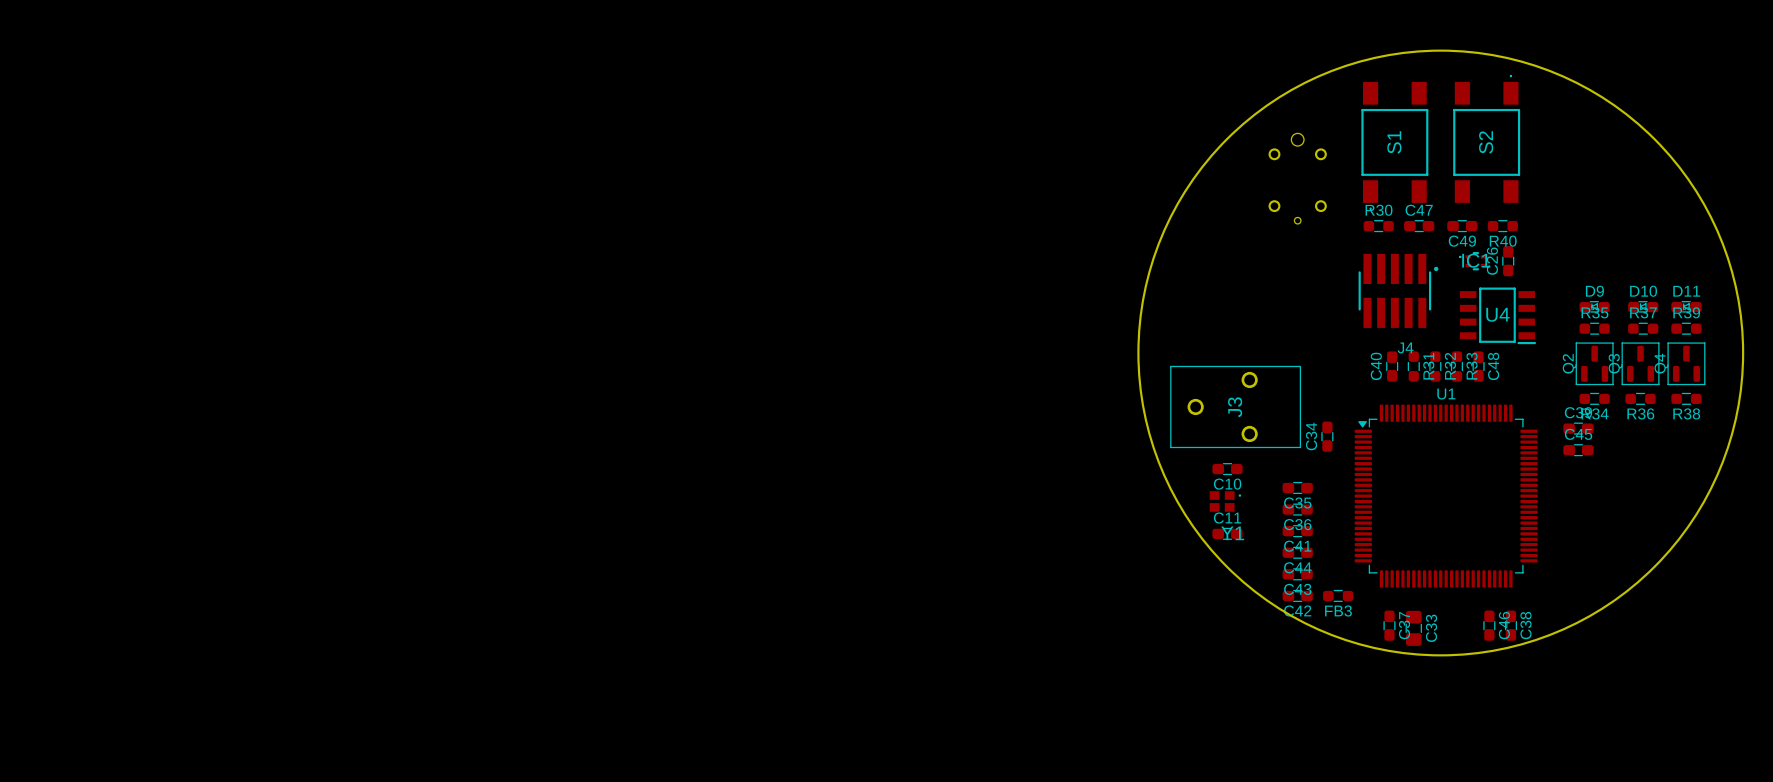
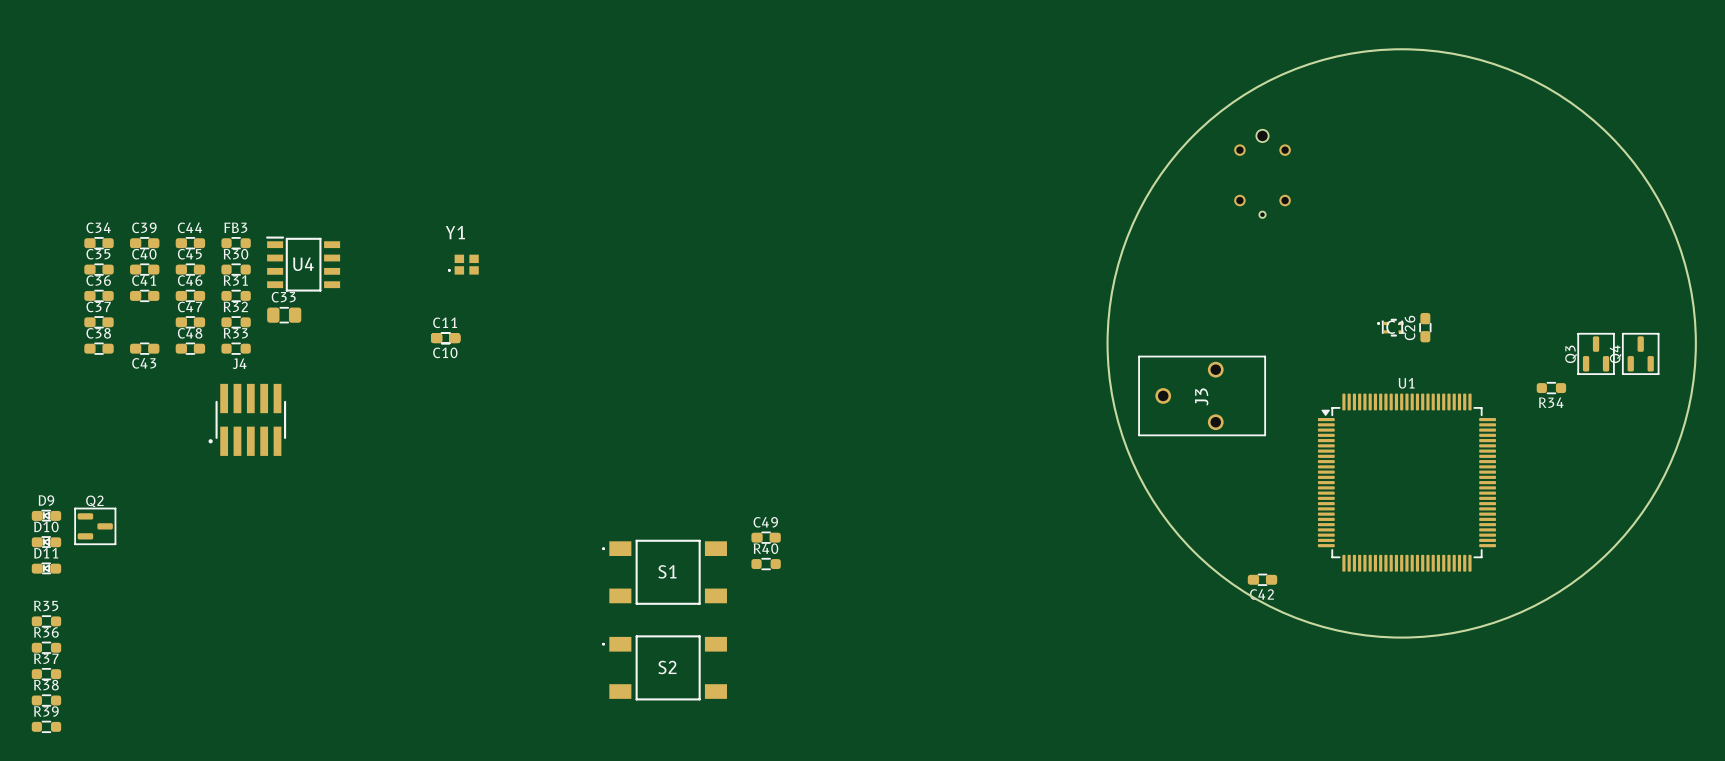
S2 rotation: 0° (1486, 138) -> 90° counterclockwise (664, 667)
S2 position: (1486, 138) -> (664, 667)
S1 rotation: 0° (1394, 145) -> 90° clockwise (664, 572)
S1 position: (1394, 145) -> (664, 572)
R30 position: (1378, 226) -> (236, 269)
C47 position: (1419, 226) -> (190, 322)
C49 position: (1462, 226) -> (766, 537)
R40 position: (1502, 226) -> (766, 564)
C49 name position: C49 (1462, 241) -> C49 (765, 522)
R40 name position: R40 (1503, 241) -> R40 (765, 548)
IC1 position: (1472, 261) -> (1390, 327)
C26 position: (1508, 261) -> (1425, 327)
J4 rotation: 0° (1398, 290) -> 180° (247, 419)
J4 position: (1398, 290) -> (247, 419)
D9 position: (1594, 306) -> (46, 515)
D10 position: (1643, 306) -> (46, 542)
D11 position: (1686, 306) -> (46, 568)
U4 rotation: 0° (1498, 315) -> 180° (303, 264)
U4 position: (1498, 315) -> (303, 264)
R35 position: (1594, 328) -> (46, 621)
R37 position: (1643, 328) -> (46, 674)
R39 position: (1686, 328) -> (46, 726)
Q2 rotation: 0° (1594, 363) -> 90° clockwise (95, 526)
Q2 position: (1594, 363) -> (95, 526)
C40 rotation: 0° (1392, 366) -> 90° clockwise (144, 269)
C40 position: (1392, 366) -> (144, 269)
R31 rotation: 0° (1413, 366) -> 90° clockwise (236, 295)
R31 position: (1413, 366) -> (236, 295)
R31 name position: R31 (1428, 366) -> R31 (235, 280)
R32 rotation: 0° (1435, 366) -> 90° clockwise (236, 322)
R32 position: (1435, 366) -> (236, 322)
R32 name position: R32 (1450, 366) -> R32 (235, 306)
R33 rotation: 0° (1456, 366) -> 90° clockwise (236, 348)
R33 position: (1456, 366) -> (236, 348)
R33 name position: R33 (1472, 366) -> R33 (235, 333)
C48 rotation: 0° (1478, 366) -> 90° clockwise (190, 348)
C48 position: (1478, 366) -> (190, 348)
C48 name position: C48 (1493, 366) -> C48 (190, 333)
R36 position: (1640, 398) -> (46, 647)
R38 position: (1686, 398) -> (46, 700)
R36 name position: R36 (1640, 413) -> R36 (46, 632)
R38 name position: R38 (1686, 413) -> R38 (46, 685)
C39 position: (1578, 428) -> (144, 243)
C34 rotation: 0° (1327, 436) -> 90° clockwise (99, 243)
C34 position: (1327, 436) -> (99, 243)
C45 position: (1578, 450) -> (190, 269)
C10 position: (1227, 469) -> (445, 338)
C35 position: (1297, 487) -> (99, 269)
Y1 rotation: 0° (1225, 501) -> 180° (463, 264)
Y1 position: (1225, 501) -> (463, 264)
C35 name position: C35 (1297, 503) -> C35 (98, 254)
C36 position: (1297, 509) -> (99, 295)
C36 name position: C36 (1297, 524) -> C36 (98, 280)
C41 position: (1297, 531) -> (144, 295)
C11 position: (1227, 533) -> (445, 338)
C41 name position: C41 (1297, 546) -> C41 (144, 280)
C44 position: (1297, 552) -> (190, 243)
C44 name position: C44 (1297, 567) -> C44 (190, 227)
C43 position: (1297, 574) -> (144, 348)
FB3 position: (1338, 595) -> (236, 243)
FB3 name position: FB3 (1338, 610) -> FB3 (235, 227)
C37 rotation: 0° (1389, 625) -> 90° clockwise (99, 322)
C37 position: (1389, 625) -> (99, 322)
C37 name position: C37 (1404, 625) -> C37 (98, 306)
C46 rotation: 0° (1489, 625) -> 90° clockwise (190, 295)
C46 position: (1489, 625) -> (190, 295)
C46 name position: C46 (1504, 625) -> C46 (190, 280)
C38 rotation: 0° (1510, 625) -> 90° clockwise (99, 348)
C38 position: (1510, 625) -> (99, 348)
C38 name position: C38 (1525, 625) -> C38 (98, 333)
C33 rotation: 0° (1413, 628) -> 90° clockwise (284, 315)
C33 position: (1413, 628) -> (284, 315)
C33 name position: C33 (1431, 628) -> C33 (283, 297)

